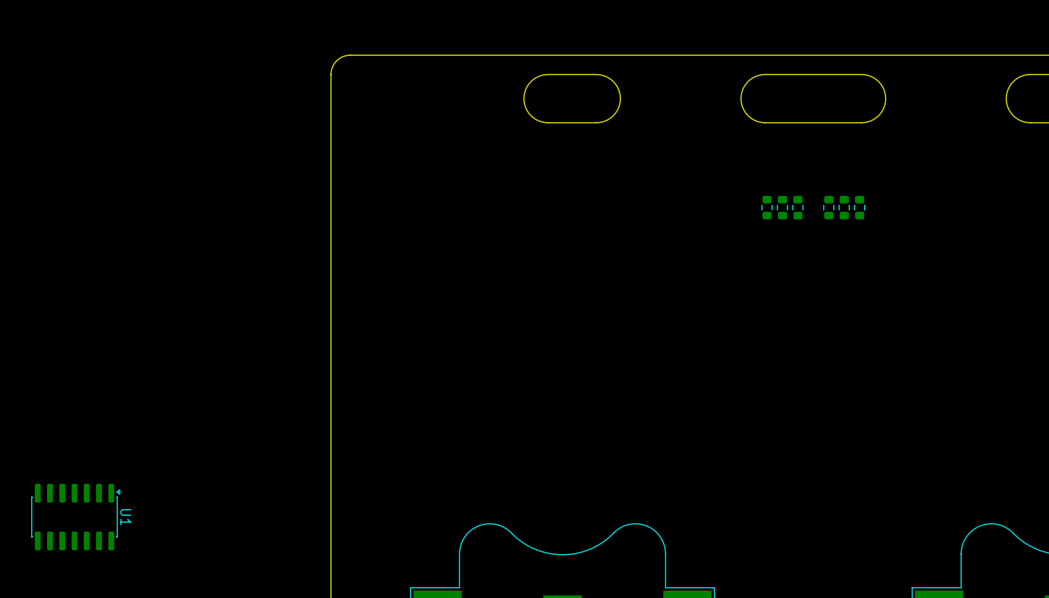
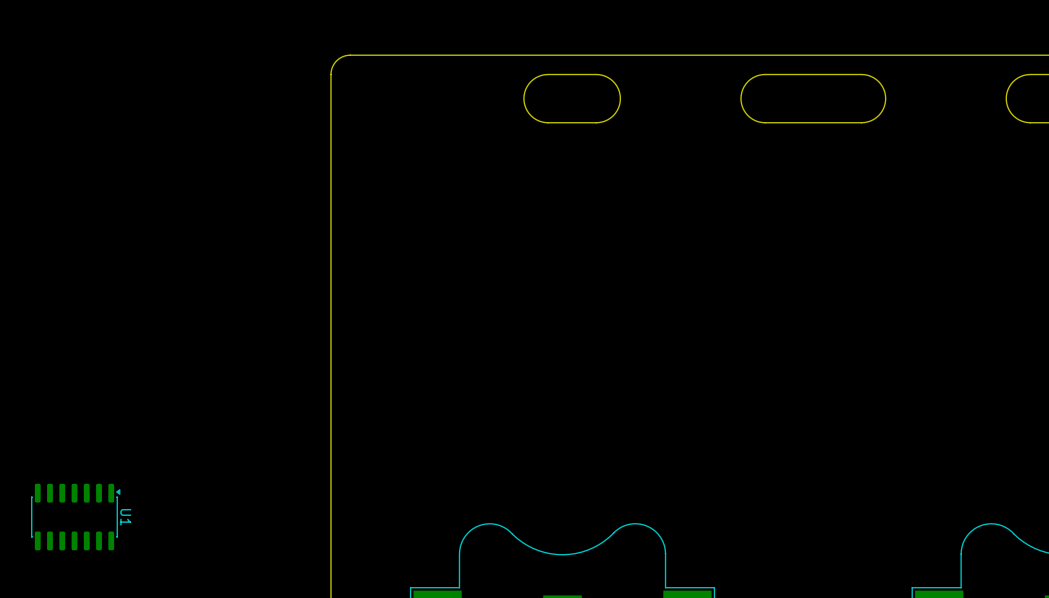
part: (767, 207) -> none
part: (782, 207) -> none
part: (797, 207) -> none
part: (828, 207) -> none
part: (844, 207) -> none
part: (859, 207) -> none

